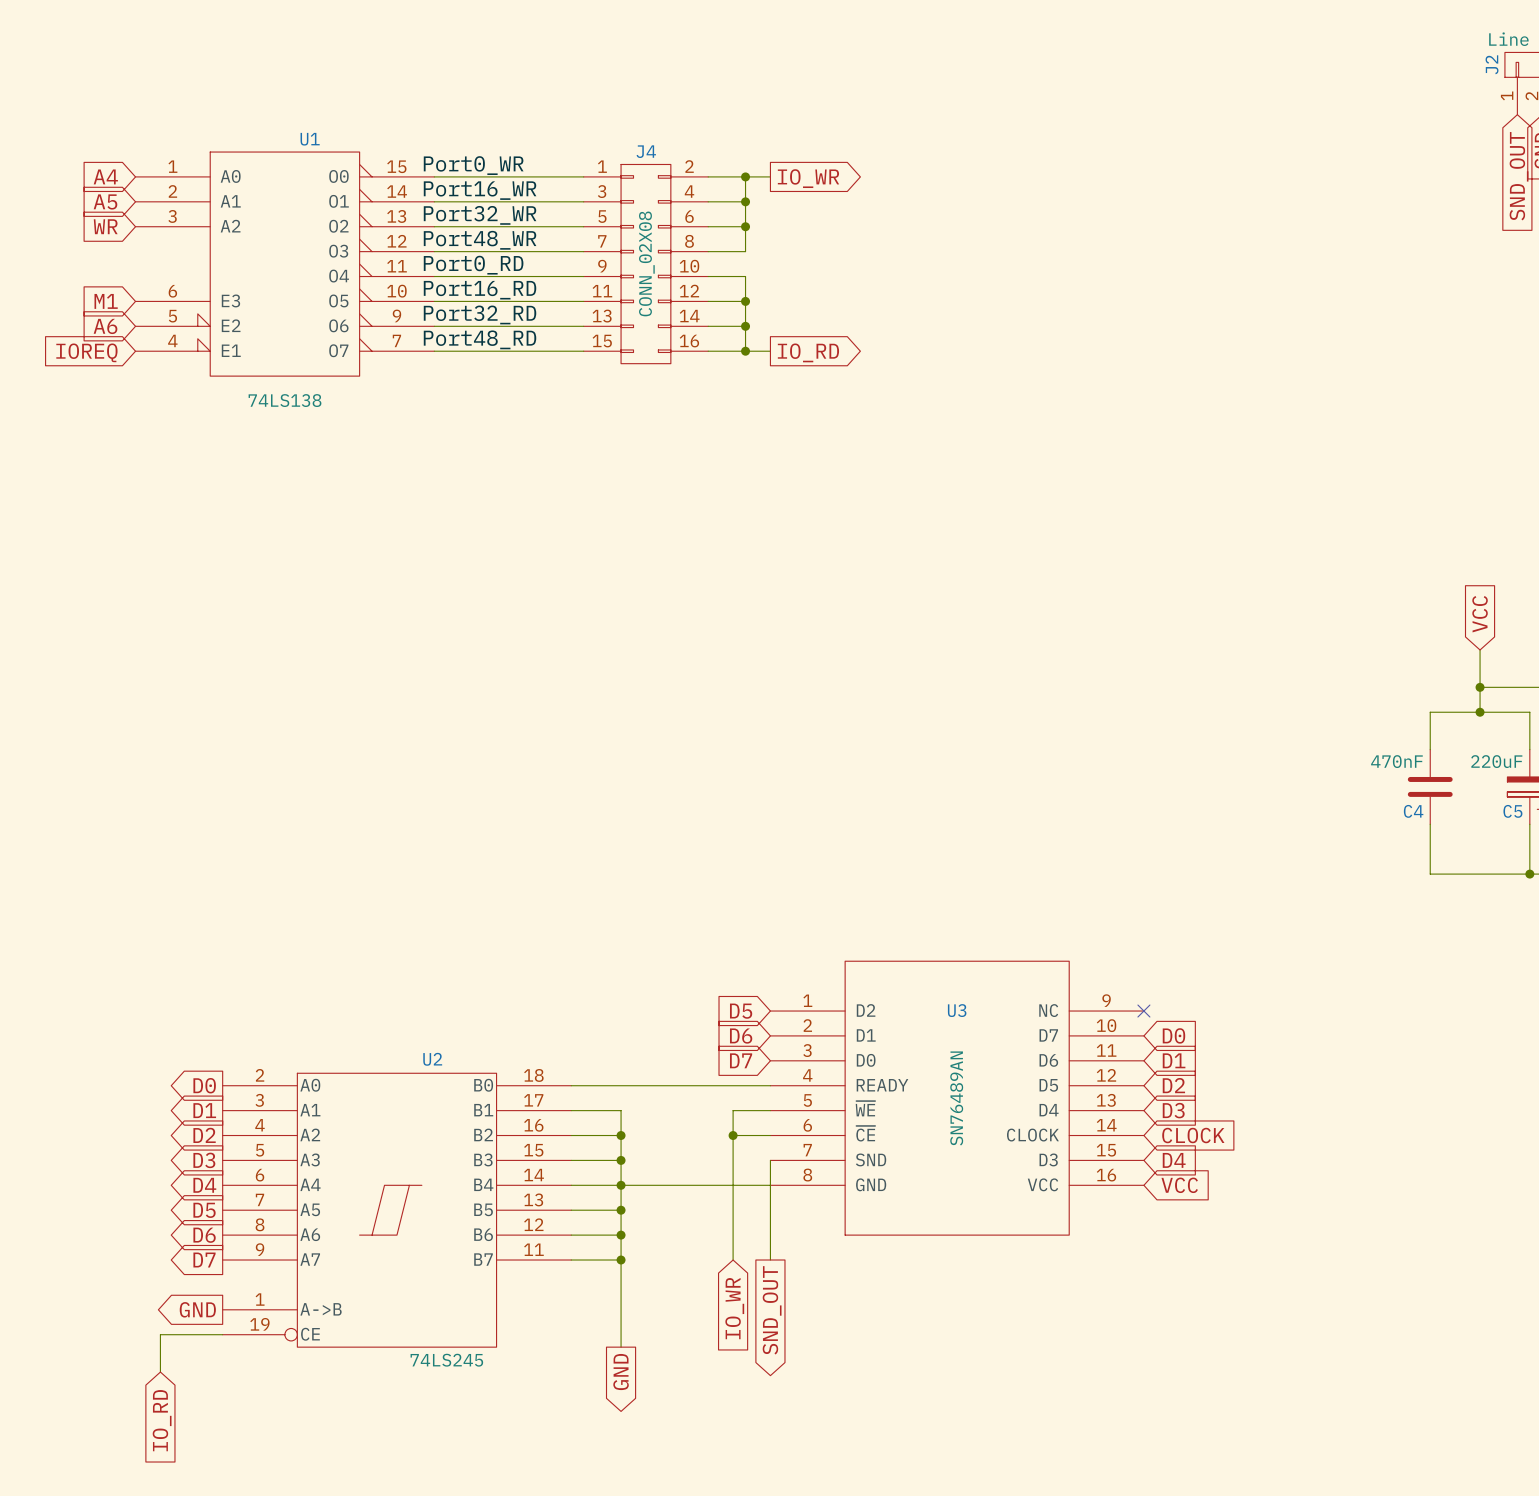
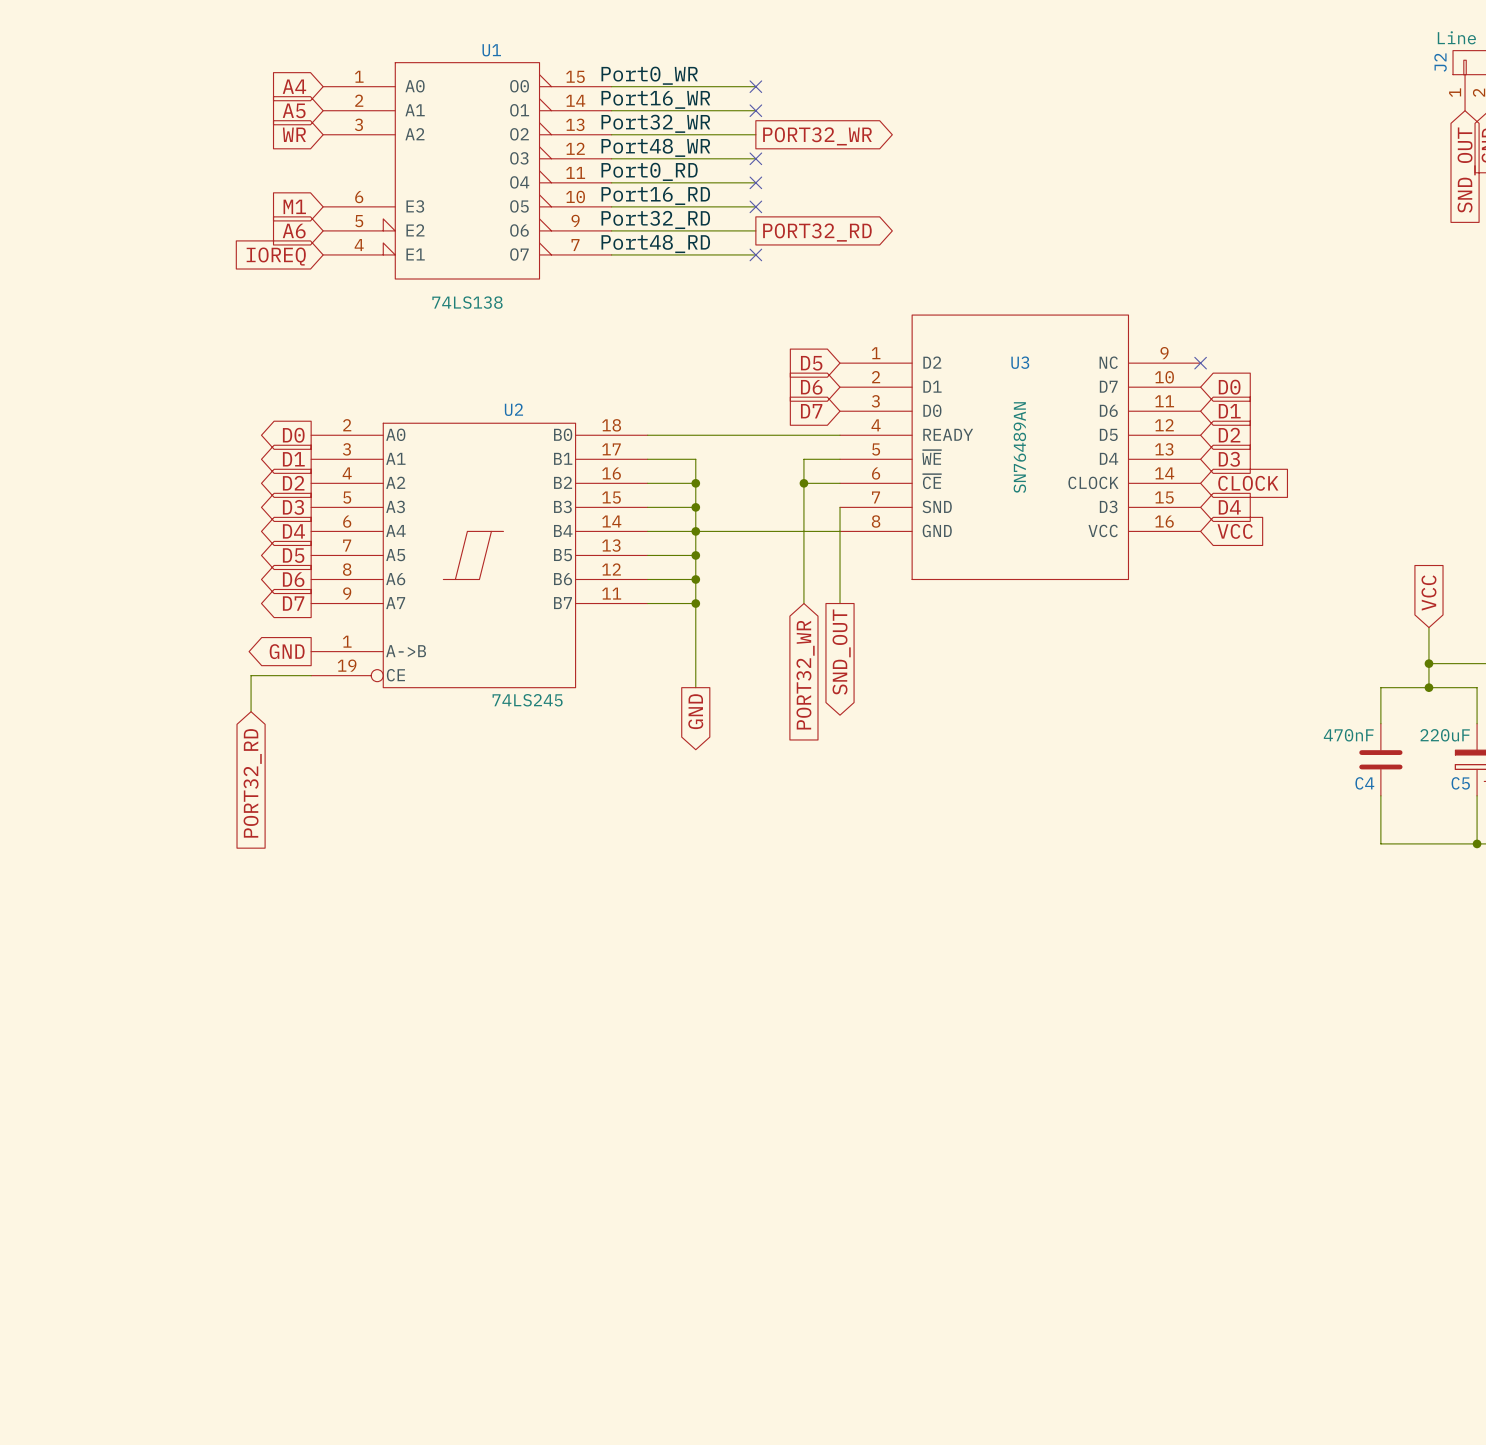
no-connect mark: none -> (755, 86)
no-connect mark: none -> (755, 110)
global label: none -> PORT32_WR (817, 136)
no-connect mark: none -> (755, 158)
label position: Port0_WR (473, 165) -> Port0_WR (649, 75)
global label position: A4 (105, 176) -> A4 (294, 86)
wire: (434, 176) (583, 176) -> (611, 86) (755, 86)
wire: (708, 176) (770, 176) -> none
wire: (745, 176) (745, 251) (708, 251) -> none
junction: (745, 176) -> none
global label: IO_WR (808, 178) -> none
no-connect mark: none -> (755, 182)
label position: Port16_WR (480, 190) -> Port16_WR (655, 99)
global label position: A5 (105, 201) -> A5 (294, 110)
wire: (434, 201) (583, 201) -> (611, 110) (755, 110)
wire: (708, 201) (745, 201) -> none
junction: (745, 201) -> none
no-connect mark: none -> (755, 206)
label position: Port32_WR (480, 215) -> Port32_WR (655, 123)
global label position: WR (105, 226) -> WR (294, 134)
wire: (434, 226) (583, 226) -> (611, 134) (755, 134)
wire: (708, 226) (745, 226) -> none
junction: (745, 226) -> none
label position: Port48_WR (480, 240) -> Port48_WR (655, 147)
global label: none -> PORT32_RD (817, 232)
wire: (434, 251) (583, 251) -> (611, 158) (755, 158)
U1 position: (284, 264) -> (467, 170)
J4: CONN_02X08 (645, 264) -> none
no-connect mark: none -> (755, 254)
label position: Port0_RD (473, 265) -> Port0_RD (649, 171)
wire: (434, 276) (583, 276) -> (611, 182) (755, 182)
wire: (708, 276) (745, 276) (745, 351) -> none
label position: Port16_RD (480, 290) -> Port16_RD (655, 196)
global label position: M1 (106, 301) -> M1 (294, 206)
wire: (434, 301) (583, 301) -> (611, 206) (755, 206)
wire: (708, 301) (745, 301) -> none
junction: (745, 301) -> none
label position: Port32_RD (480, 314) -> Port32_RD (655, 219)
global label position: A6 (105, 326) -> A6 (294, 231)
wire: (434, 326) (583, 326) -> (611, 230) (755, 230)
wire: (708, 326) (745, 326) -> (803, 483) (840, 483)
junction: (745, 326) -> none
label position: Port48_RD (480, 339) -> Port48_RD (655, 244)
wire: (434, 351) (583, 351) -> (611, 254) (755, 254)
wire: (708, 351) (770, 351) -> none
junction: (745, 351) -> none
global label position: IOREQ (86, 352) -> IOREQ (276, 256)
global label: IO_RD (808, 352) -> none
global label: none -> D5 (811, 363)
no-connect mark: none -> (1200, 363)
global label: none -> D6 (811, 387)
global label: none -> D0 (1229, 387)
global label: none -> D7 (811, 411)
global label: none -> D1 (1229, 411)
global label: none -> D0 (293, 435)
wire: none -> (647, 435) (840, 435)
global label: none -> D2 (1229, 435)
global label: none -> D1 (293, 459)
wire: none -> (647, 459) (695, 459) (695, 687)
wire: none -> (840, 459) (803, 459) (803, 603)
global label: none -> D3 (1229, 459)
global label: none -> D2 (293, 483)
wire: none -> (647, 483) (695, 483)
junction: none -> (695, 483)
junction: none -> (803, 483)
global label: none -> CLOCK (1248, 483)
global label: none -> D3 (293, 507)
wire: none -> (647, 507) (695, 507)
junction: none -> (695, 507)
wire: none -> (840, 507) (840, 603)
global label: none -> D4 (1229, 507)
global label: none -> D4 (293, 531)
wire: none -> (647, 531) (840, 531)
junction: none -> (695, 531)
global label: none -> VCC (1235, 531)
global label: none -> D5 (293, 555)
wire: none -> (647, 555) (695, 555)
junction: none -> (695, 555)
global label: none -> D6 (293, 579)
wire: none -> (647, 579) (695, 579)
junction: none -> (695, 579)
global label: none -> D7 (293, 603)
wire: none -> (647, 603) (695, 603)
junction: none -> (695, 603)
global label: none -> GND (287, 651)
global label: none -> SND_OUT (841, 652)
wire: none -> (311, 675) (251, 675) (251, 711)
global label: none -> PORT32_WR (805, 675)
global label: none -> GND (695, 711)
global label: none -> PORT32_RD (252, 783)
global label: D5 (741, 1011) -> none
no-connect mark: (1143, 1011) -> none
global label: D0 (1173, 1035) -> none
global label: D6 (741, 1036) -> none
global label: D7 (741, 1060) -> none
global label: D1 (1174, 1060) -> none
global label: D0 (204, 1085) -> none
wire: (571, 1085) (770, 1085) -> none
global label: D2 (1173, 1085) -> none
U3 position: (957, 1098) -> (1020, 447)
global label: D1 (204, 1110) -> none
wire: (571, 1110) (621, 1110) (621, 1347) -> none
wire: (770, 1110) (733, 1110) (733, 1260) -> none
global label: D3 (1173, 1110) -> none
global label: D2 (204, 1135) -> none
wire: (571, 1135) (621, 1135) -> none
junction: (621, 1135) -> none
wire: (733, 1135) (770, 1135) -> none
junction: (733, 1135) -> none
global label: CLOCK (1193, 1135) -> none
global label: D3 (204, 1160) -> none
wire: (571, 1160) (621, 1160) -> none
junction: (621, 1160) -> none
wire: (770, 1160) (770, 1260) -> none
global label: D4 (1174, 1160) -> none
global label: D4 (204, 1185) -> none
wire: (571, 1185) (770, 1185) -> none
junction: (621, 1185) -> none
global label: VCC (1179, 1185) -> none
global label: D5 (204, 1210) -> none
U2 position: (396, 1210) -> (479, 555)
wire: (571, 1210) (621, 1210) -> none
junction: (621, 1210) -> none
global label: D6 (204, 1235) -> none
wire: (571, 1235) (621, 1235) -> none
junction: (621, 1235) -> none
global label: D7 (204, 1260) -> none
wire: (571, 1260) (621, 1260) -> none
junction: (621, 1260) -> none
global label: IO_WR (734, 1308) -> none
global label: GND (197, 1309) -> none
global label: SND_OUT (772, 1310) -> none
wire: (222, 1334) (160, 1334) (160, 1372) -> none
global label: GND (621, 1372) -> none
global label: IO_RD (162, 1420) -> none

